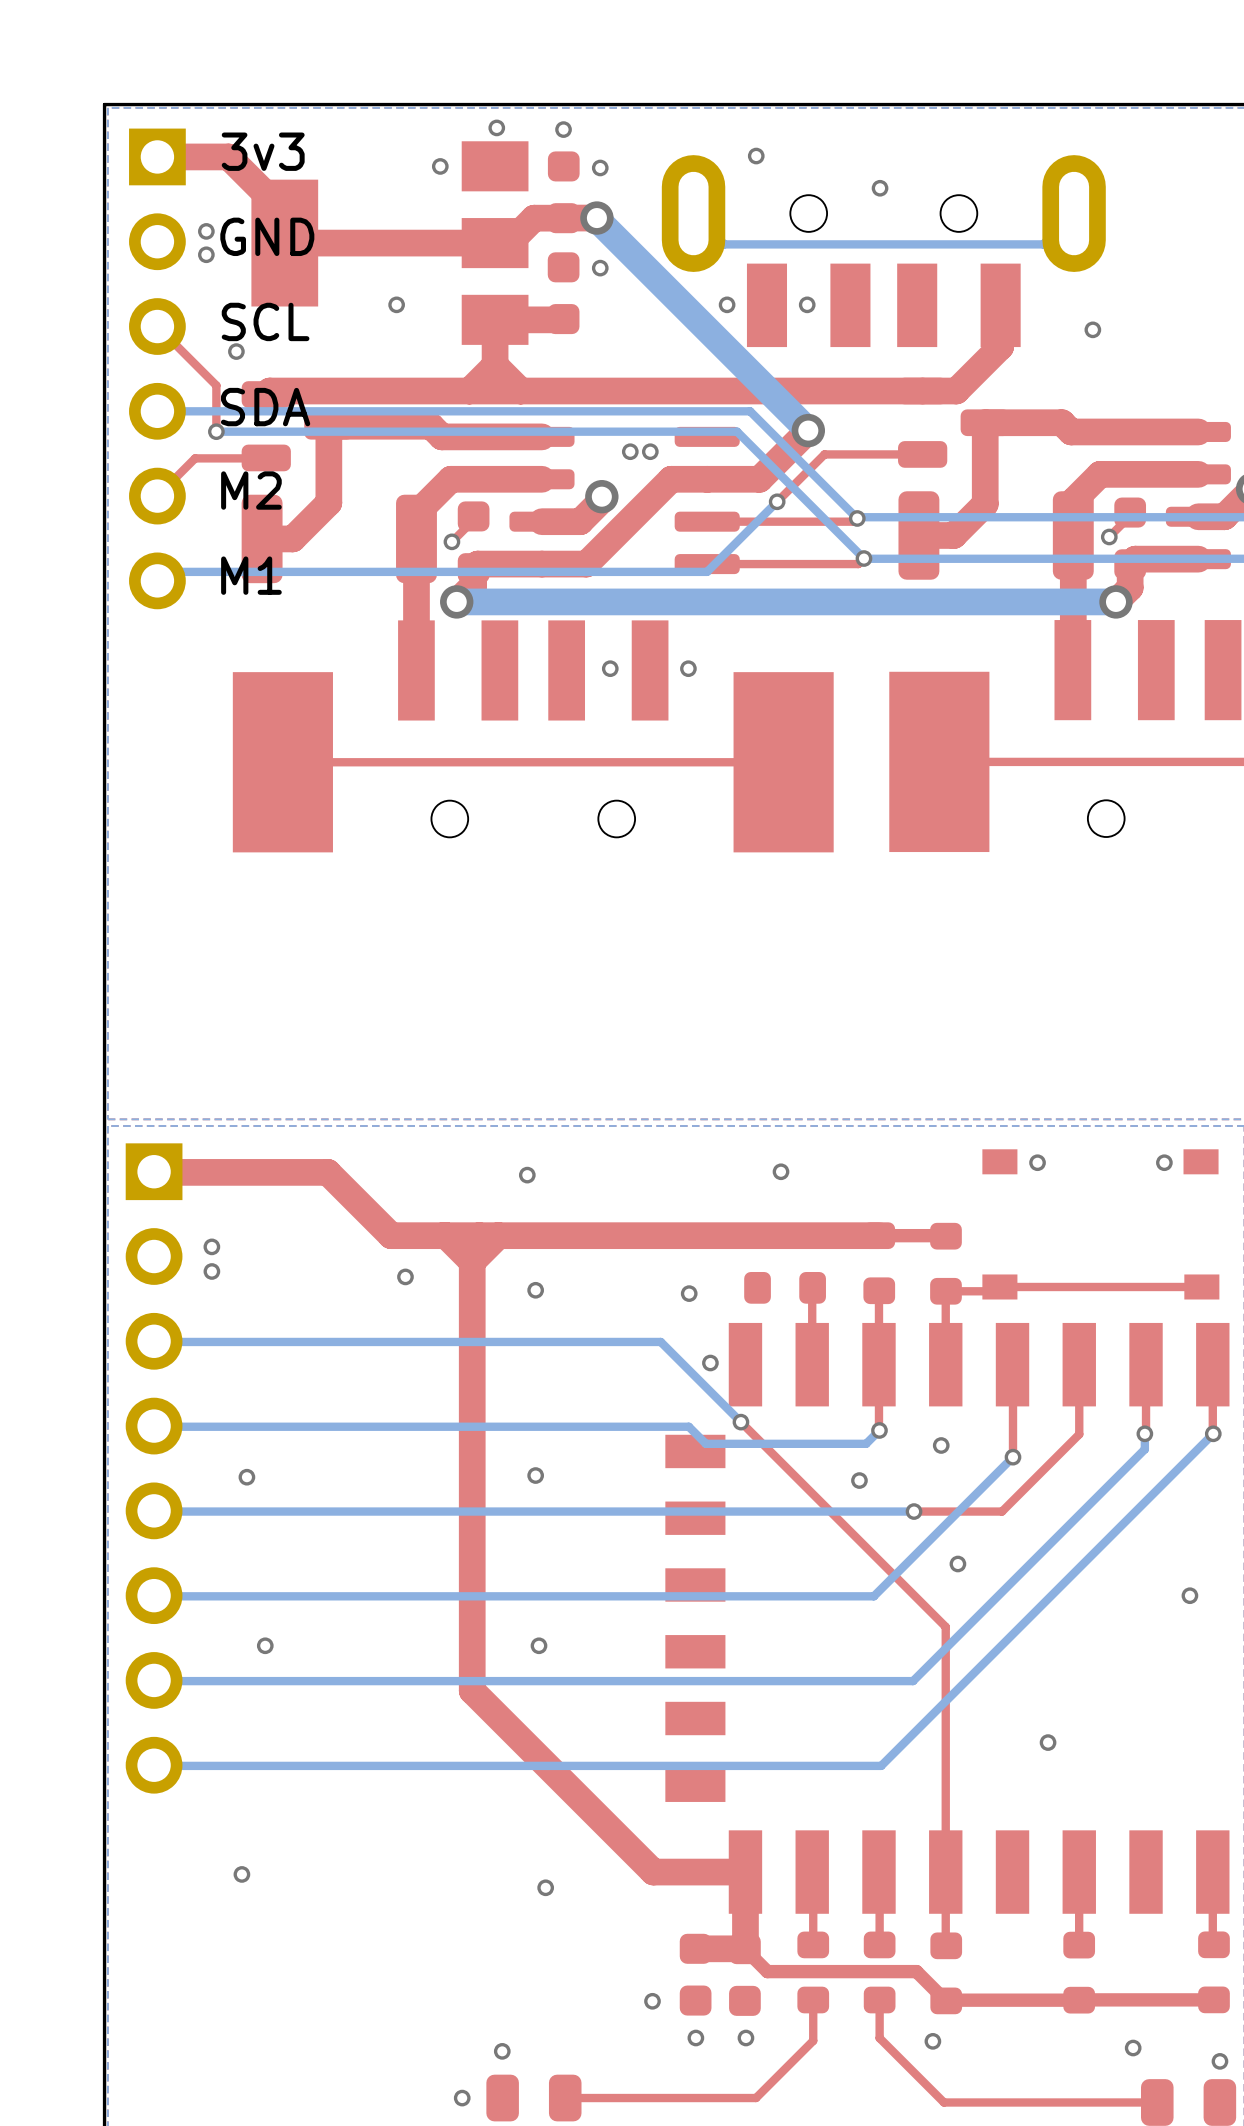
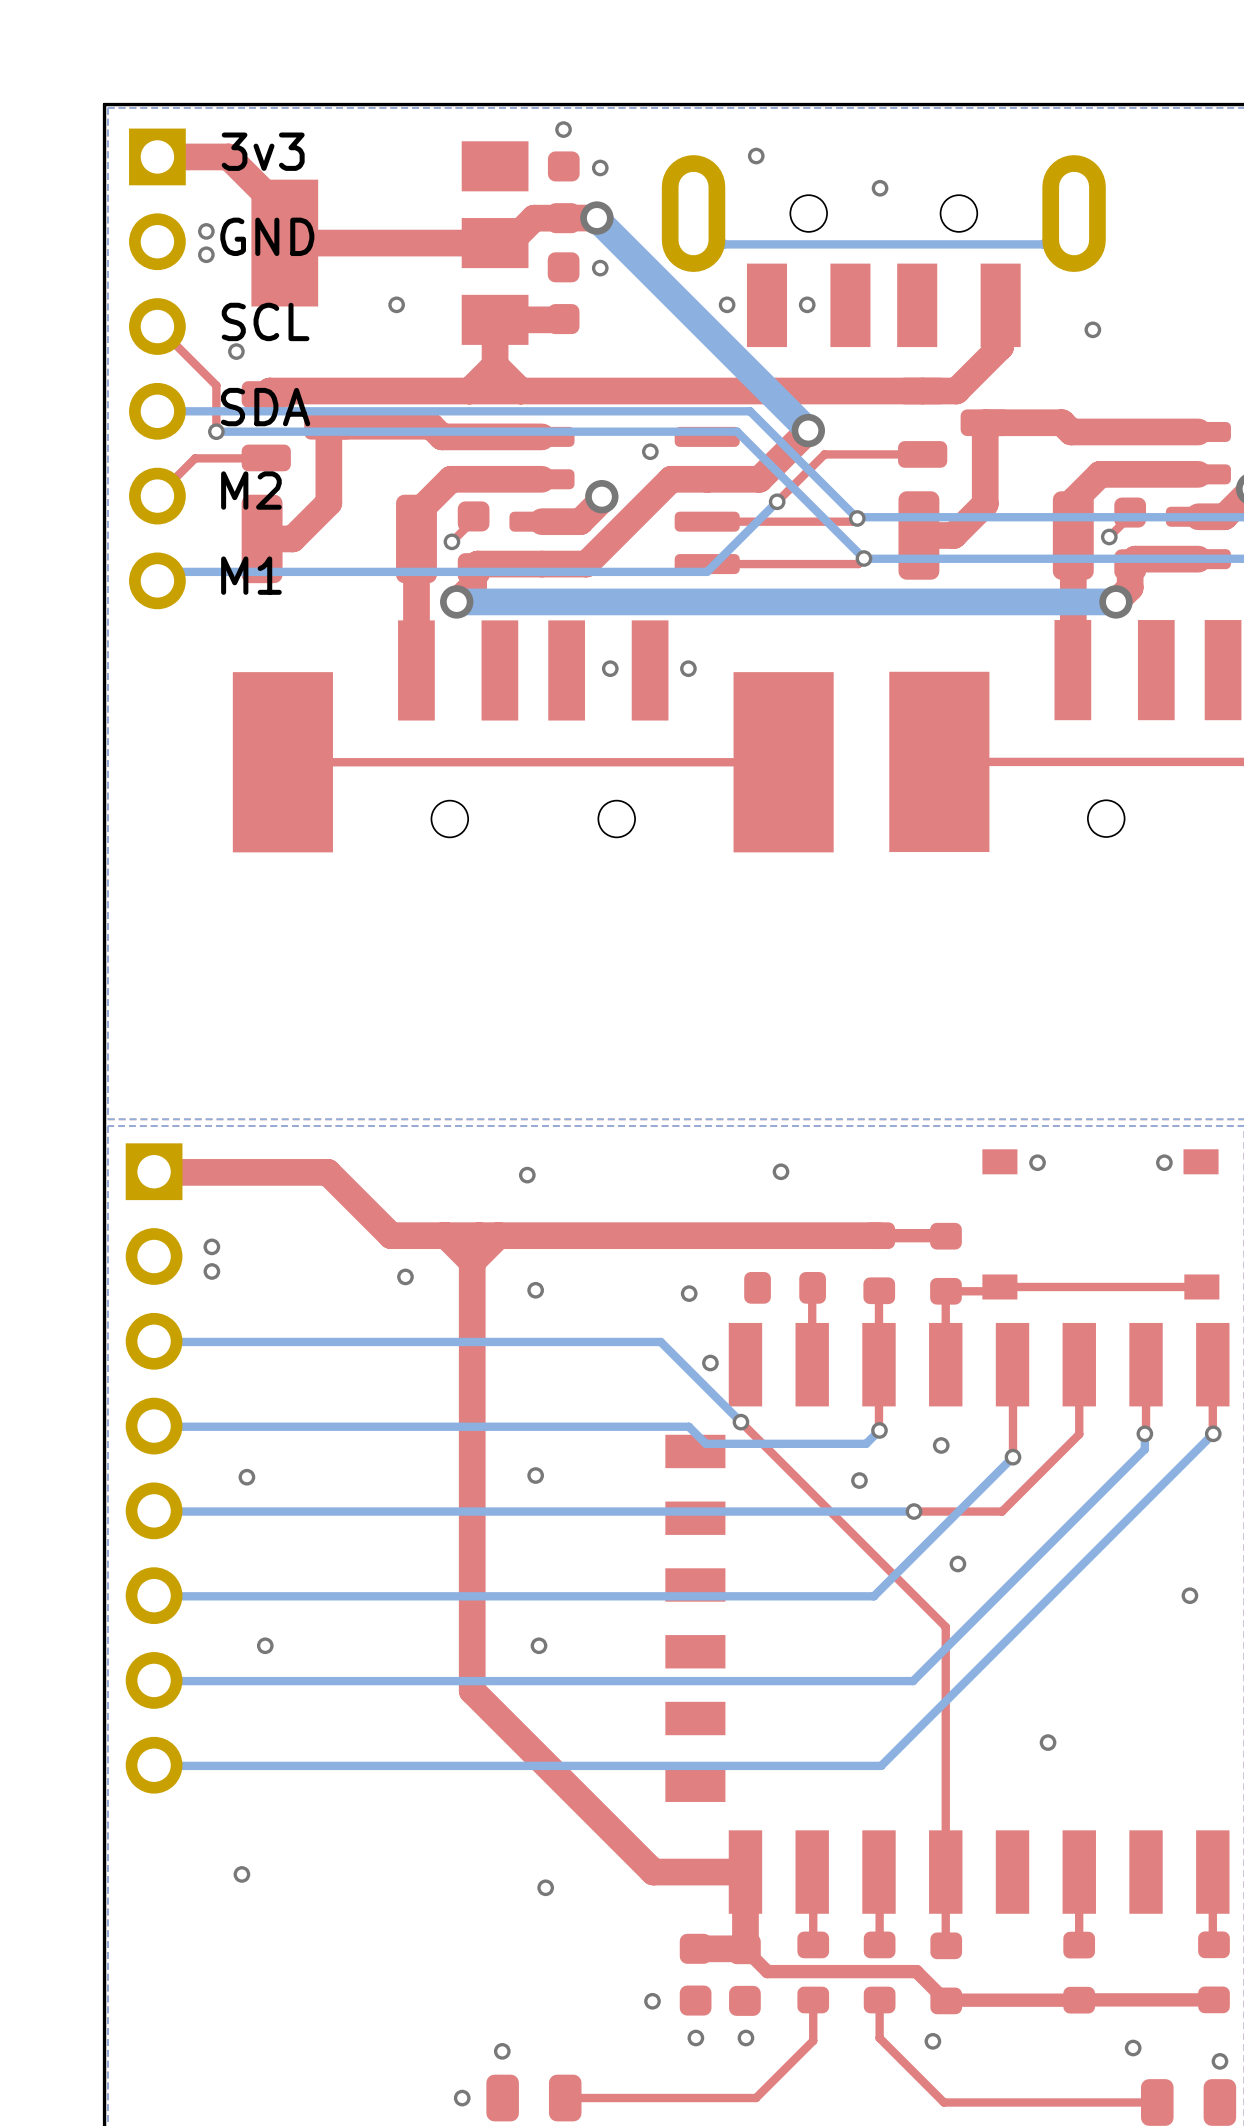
via: (496, 127) -> none
via: (440, 166) -> none
via: (630, 451) -> none

